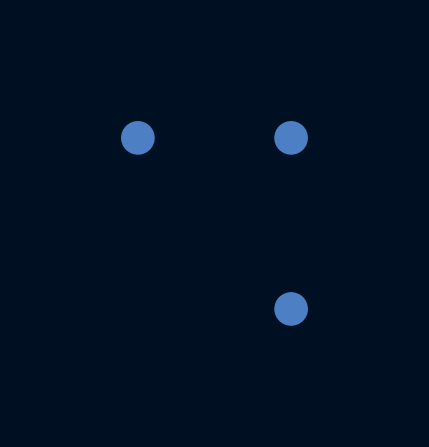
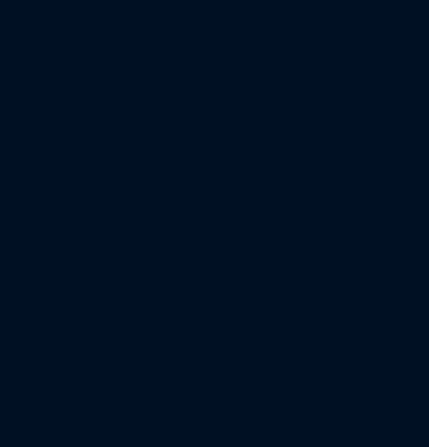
part: (137, 137) -> none
part: (291, 137) -> none
part: (291, 308) -> none

